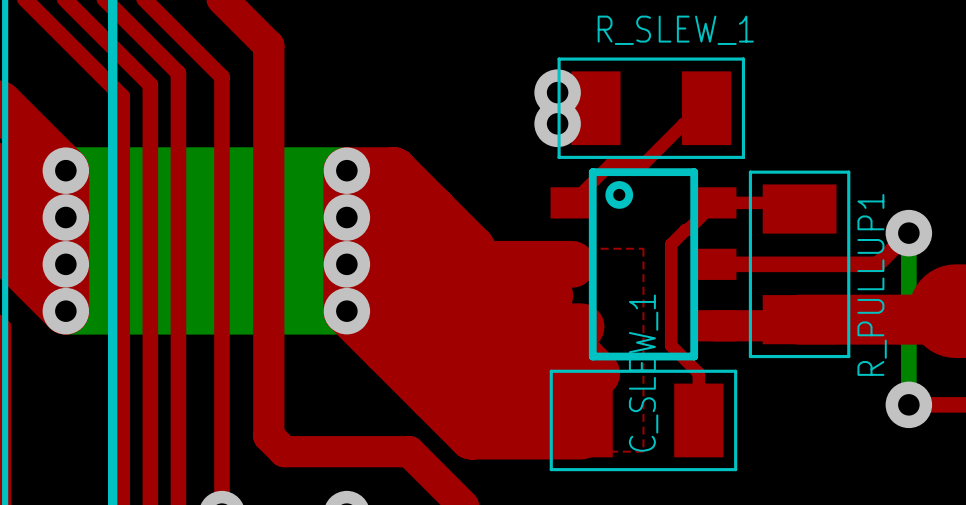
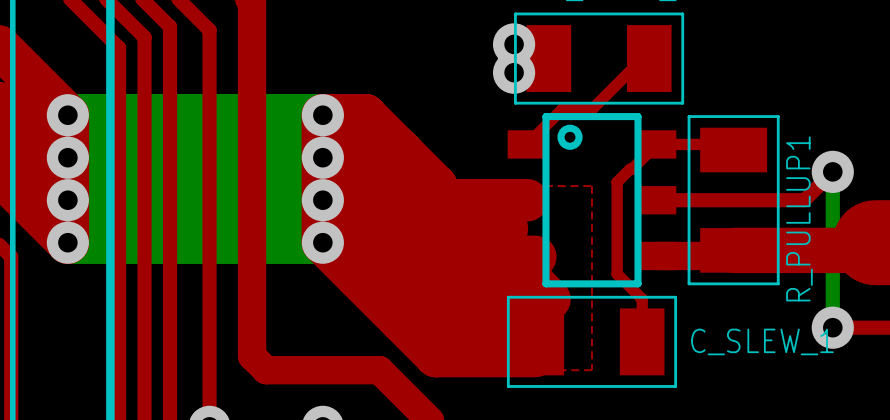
C_SLEW_1 name rotation: 0° (643, 373) -> 90° clockwise (762, 341)
C_SLEW_1 name position: C_SLEW_1 (643, 373) -> C_SLEW_1 (762, 341)

